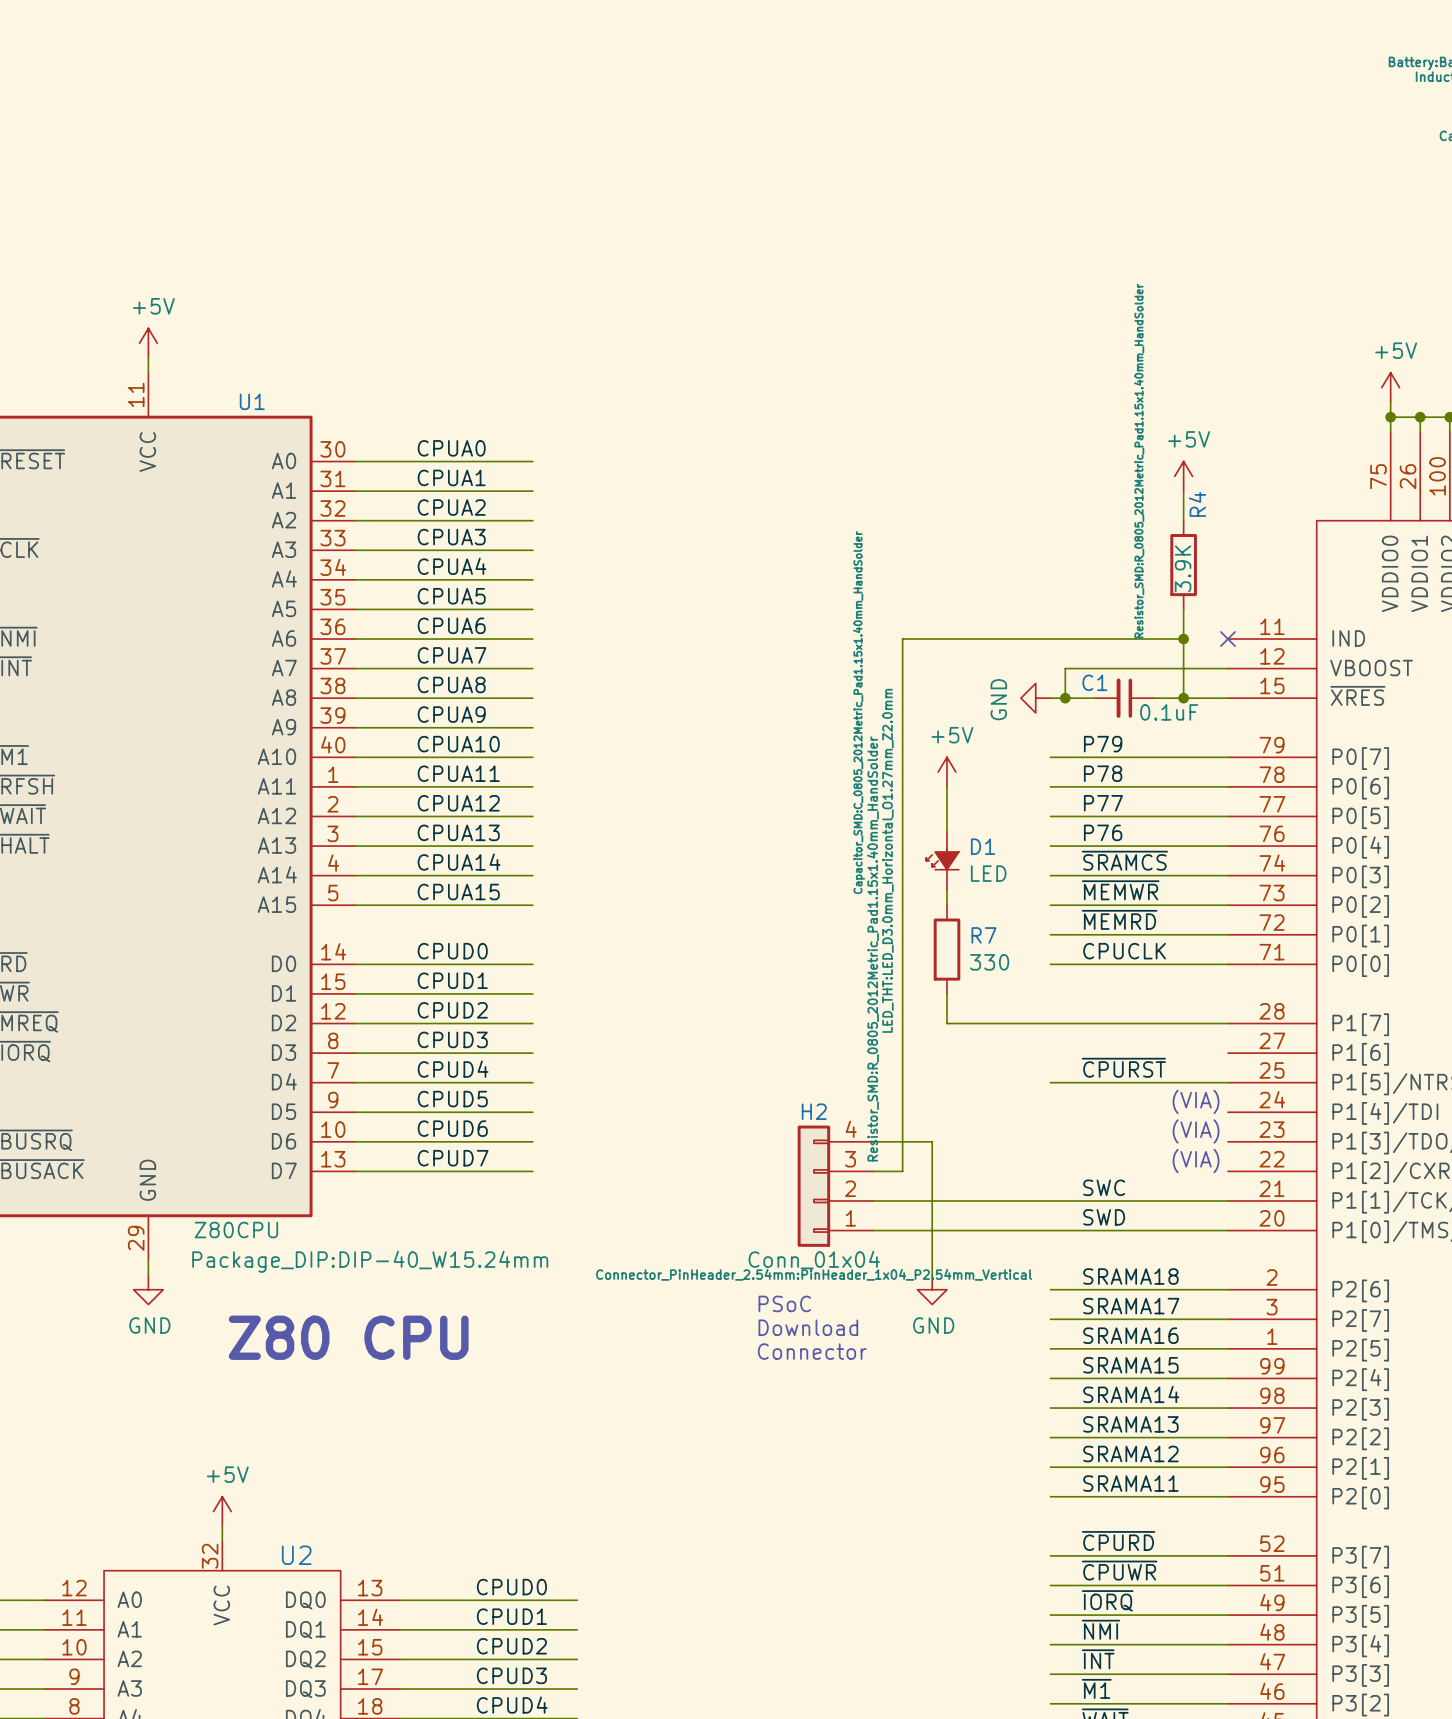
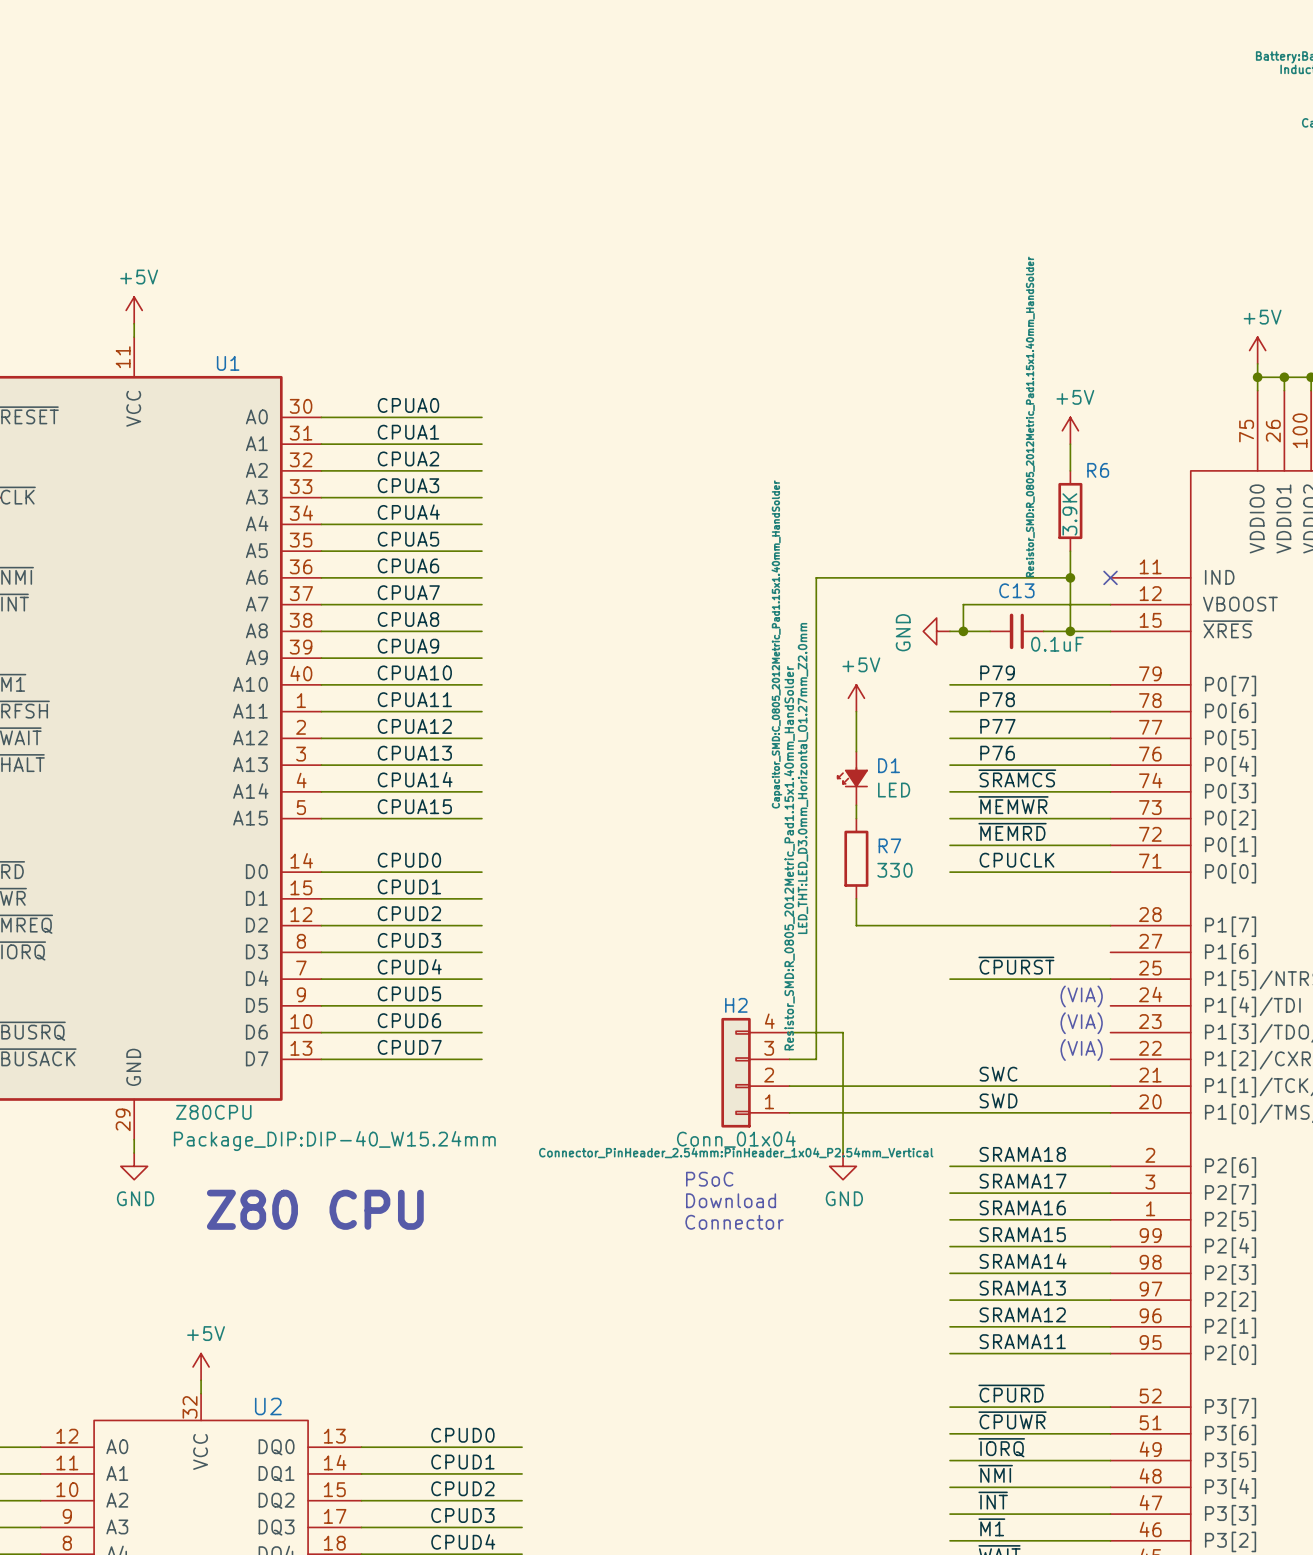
R4 name: R4 (1197, 504) -> R6 (1098, 470)
C1 name: C1 (1094, 682) -> C13 (1016, 590)

